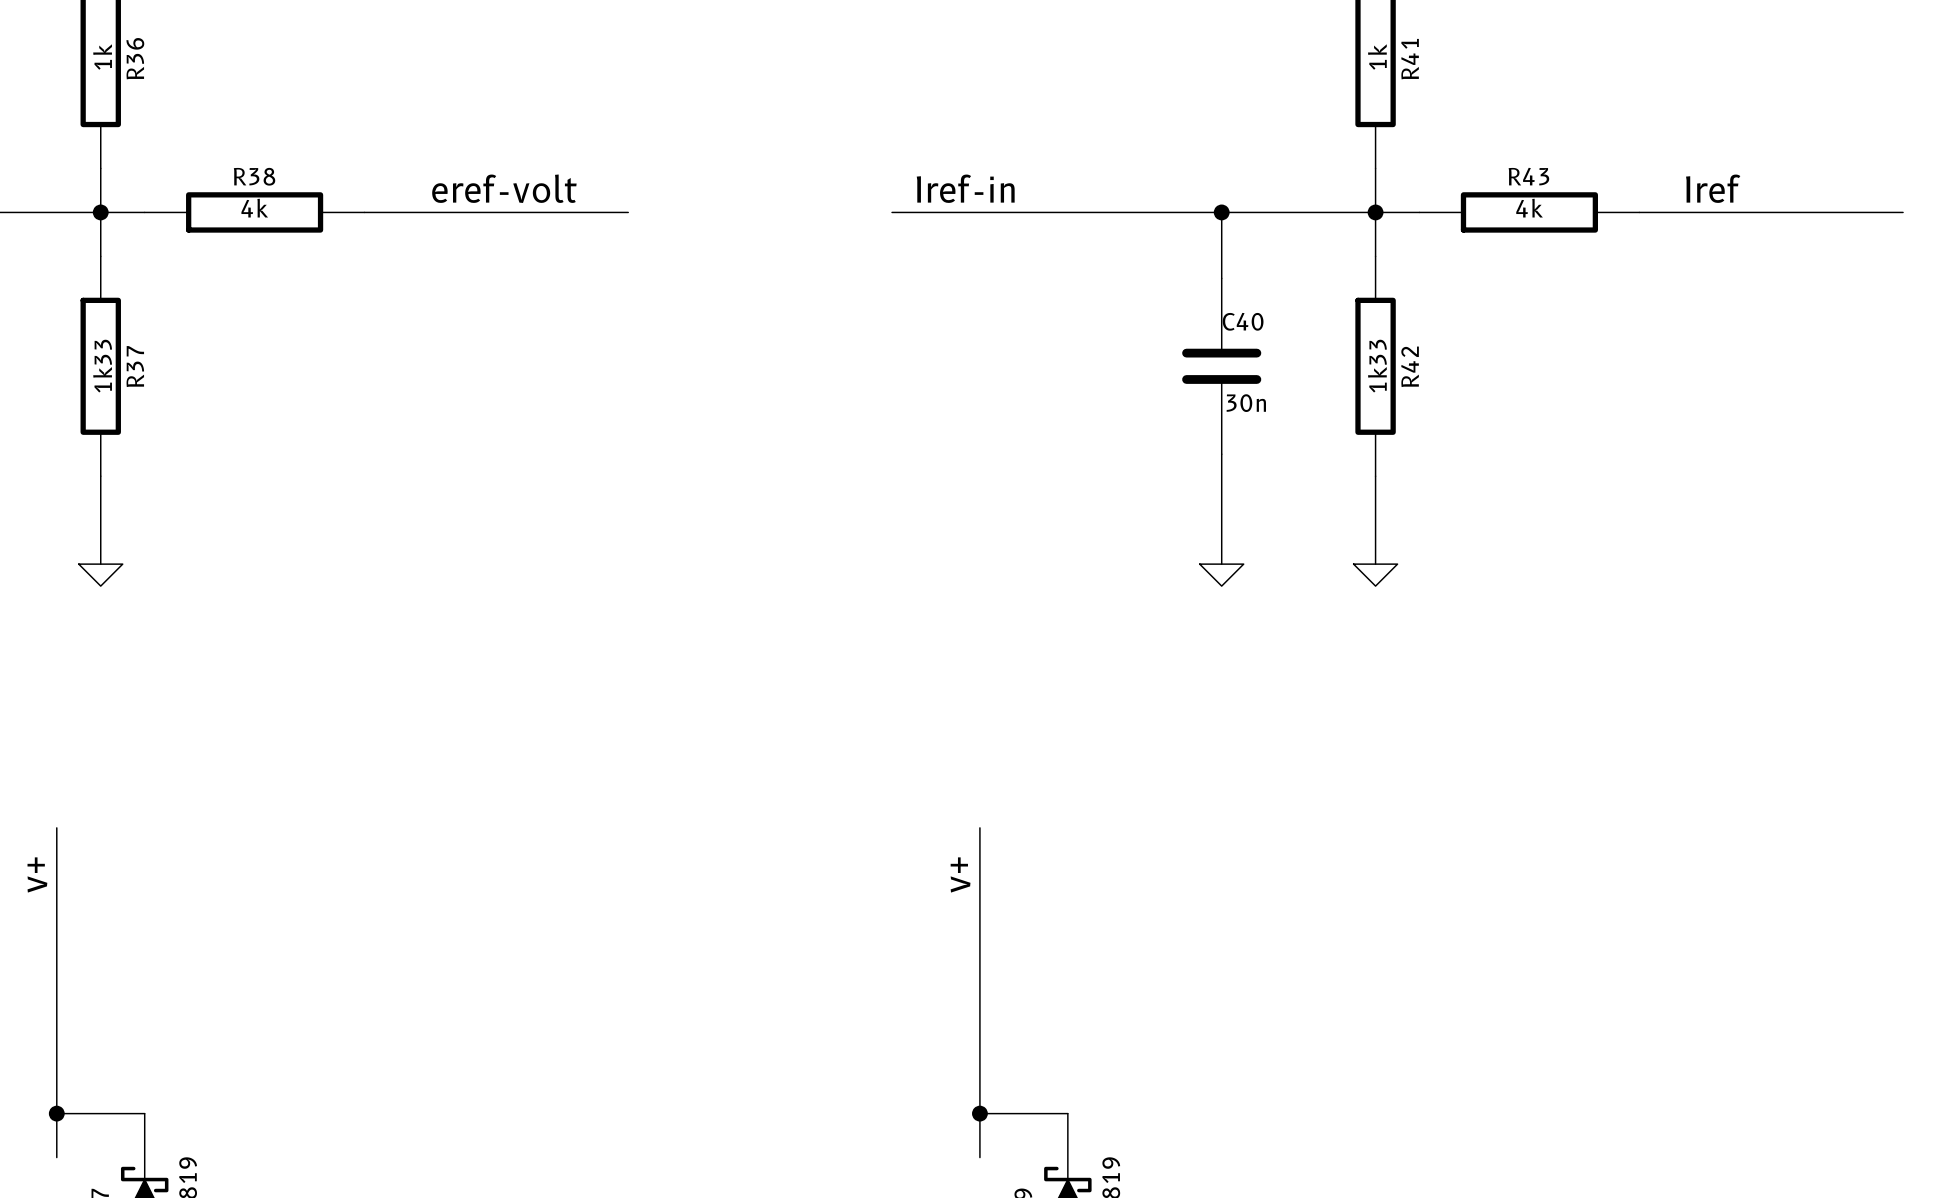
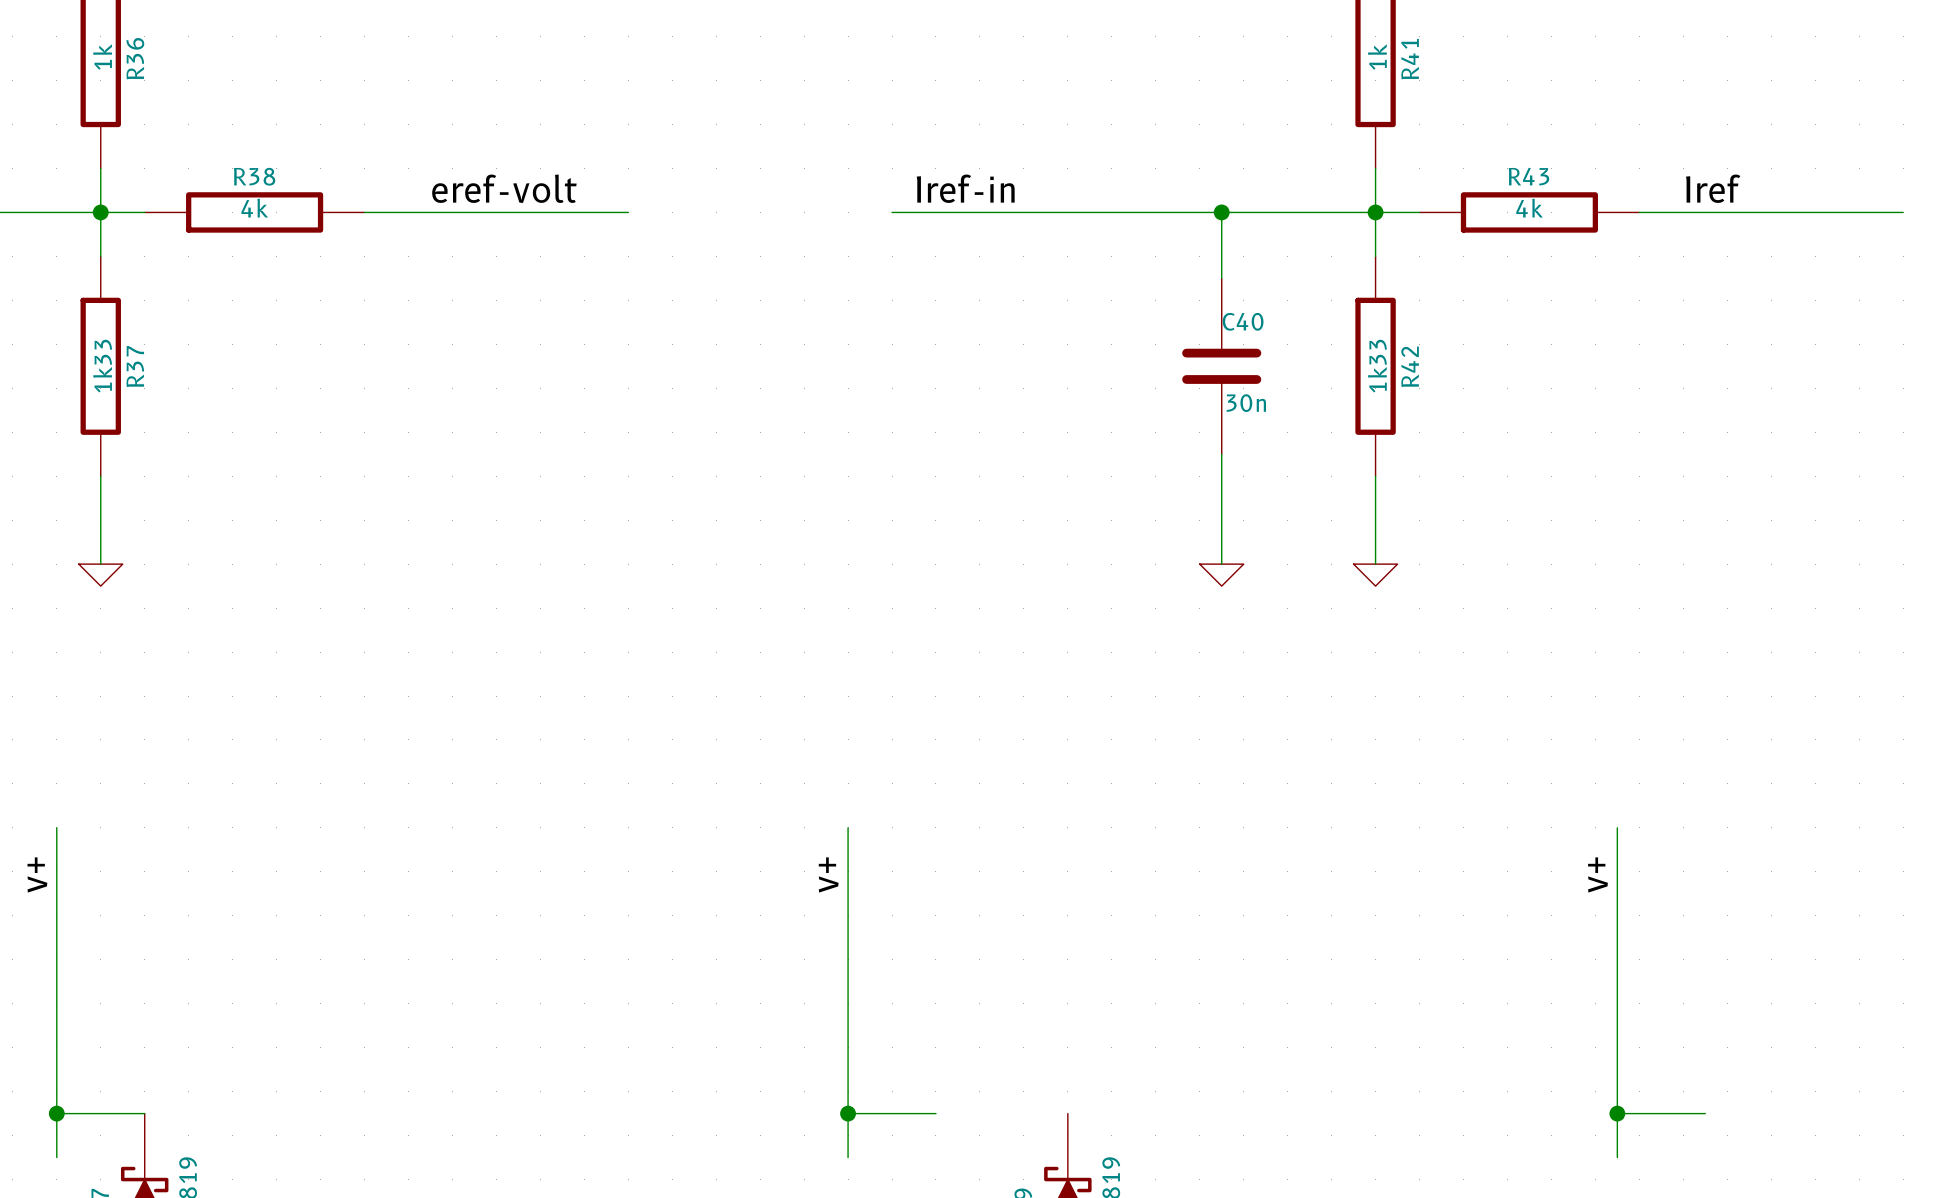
wire: (979, 827) (979, 1157) -> (848, 827) (848, 1157)
wire: none -> (1617, 827) (1617, 1157)
label position: v+ (960, 874) -> v+ (828, 874)
label: none -> v+ (1597, 874)
junction: none -> (848, 1113)
wire: (979, 1113) (1067, 1113) -> (848, 1113) (935, 1113)
junction: (979, 1113) -> none
wire: none -> (1617, 1113) (1705, 1113)
junction: none -> (1617, 1113)

